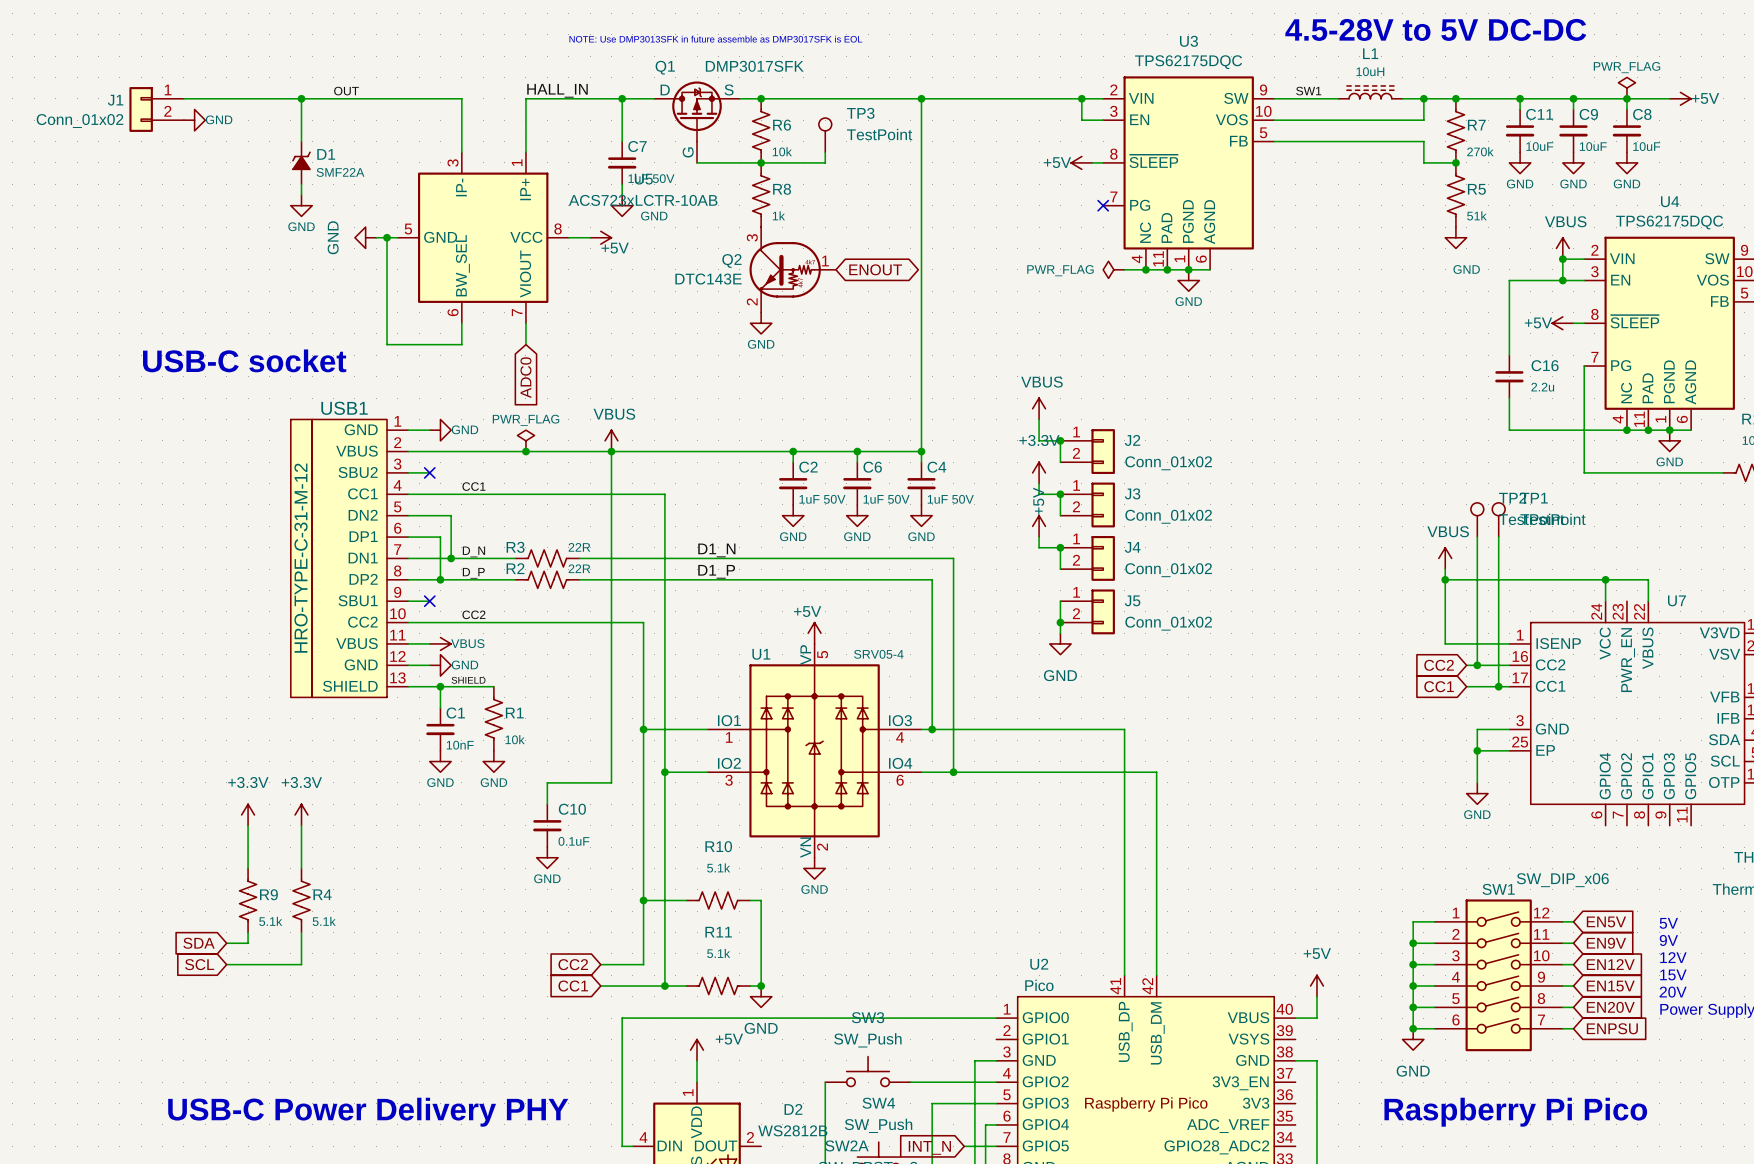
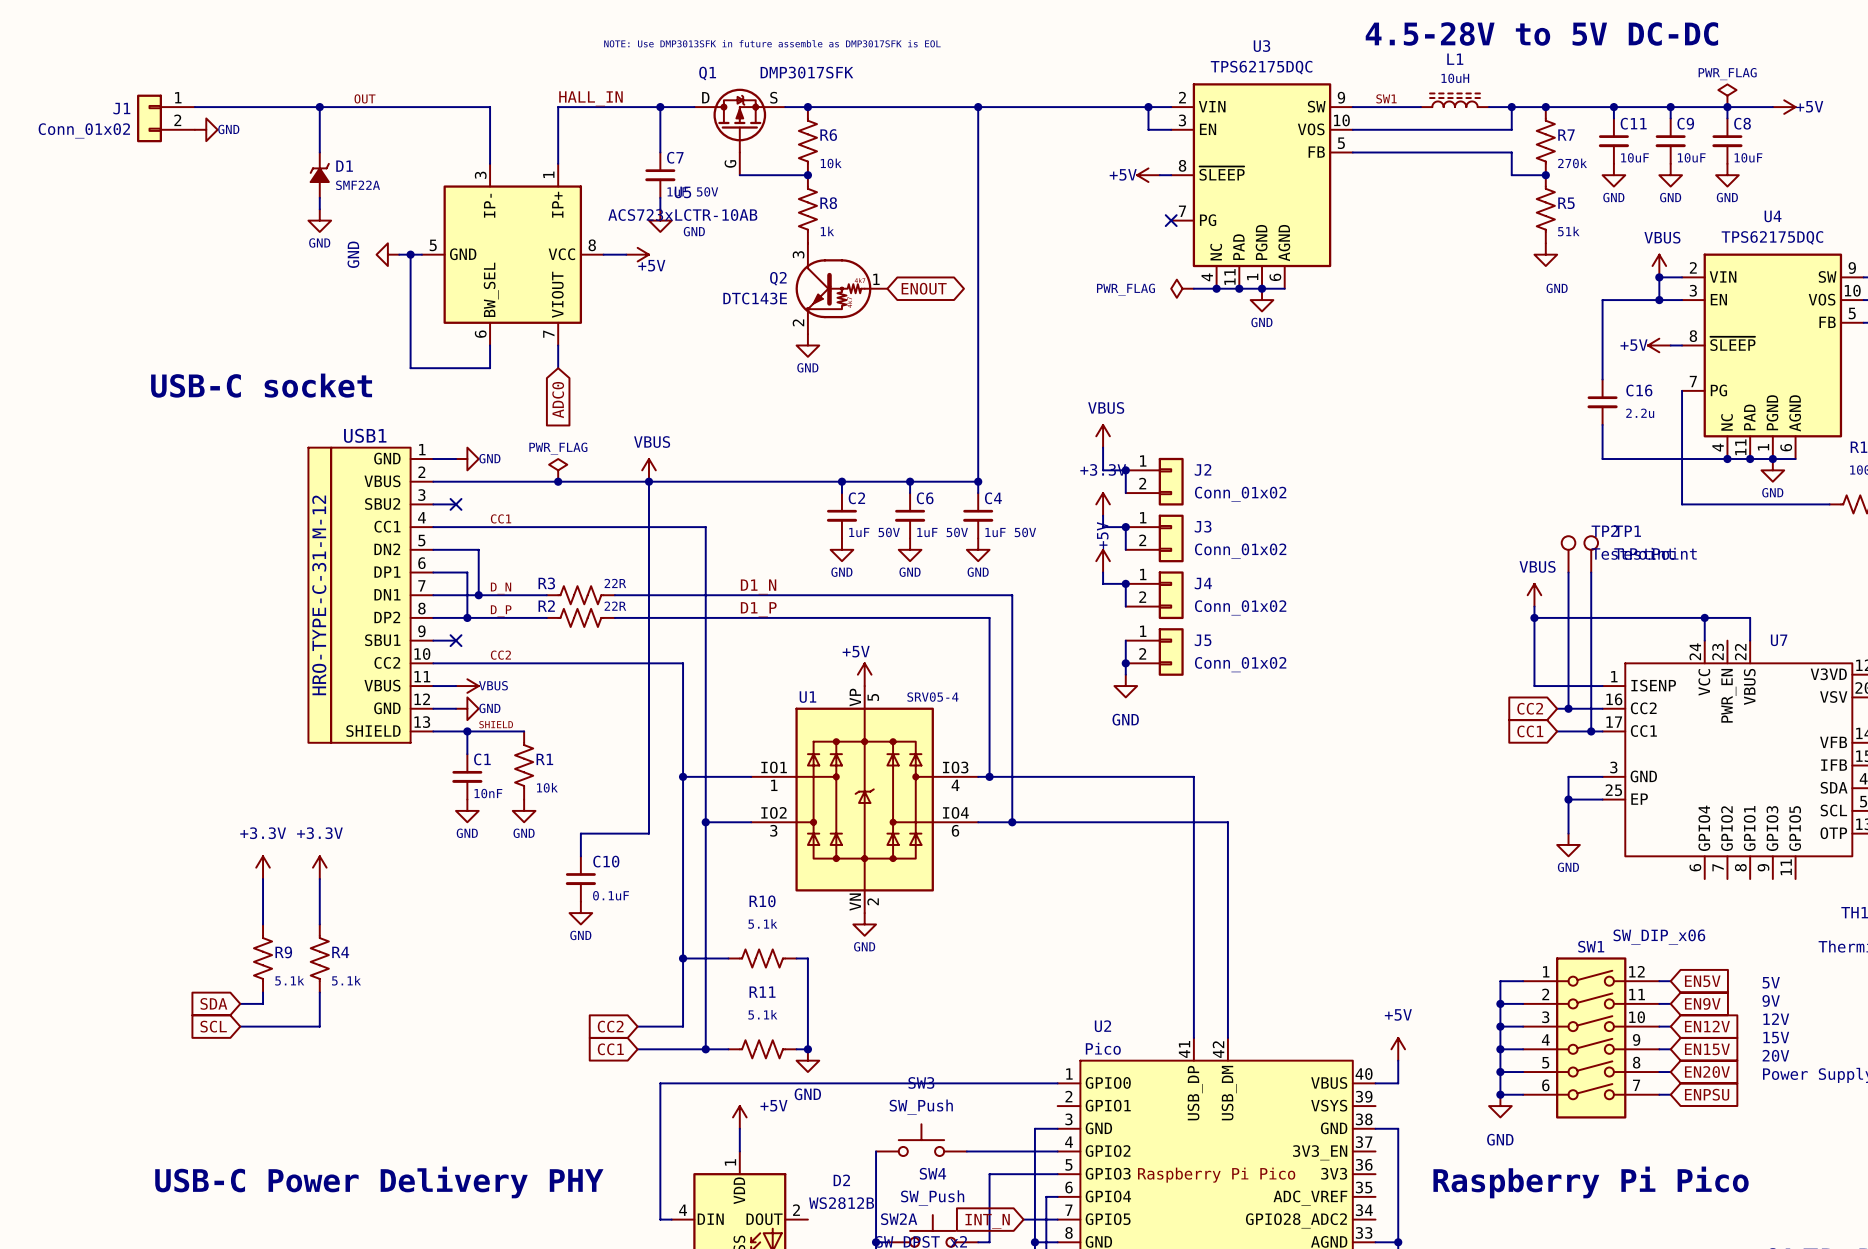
TP3: TestPoint (825, 135) -> none
wire: (825, 152) (825, 162) (761, 162) -> none

